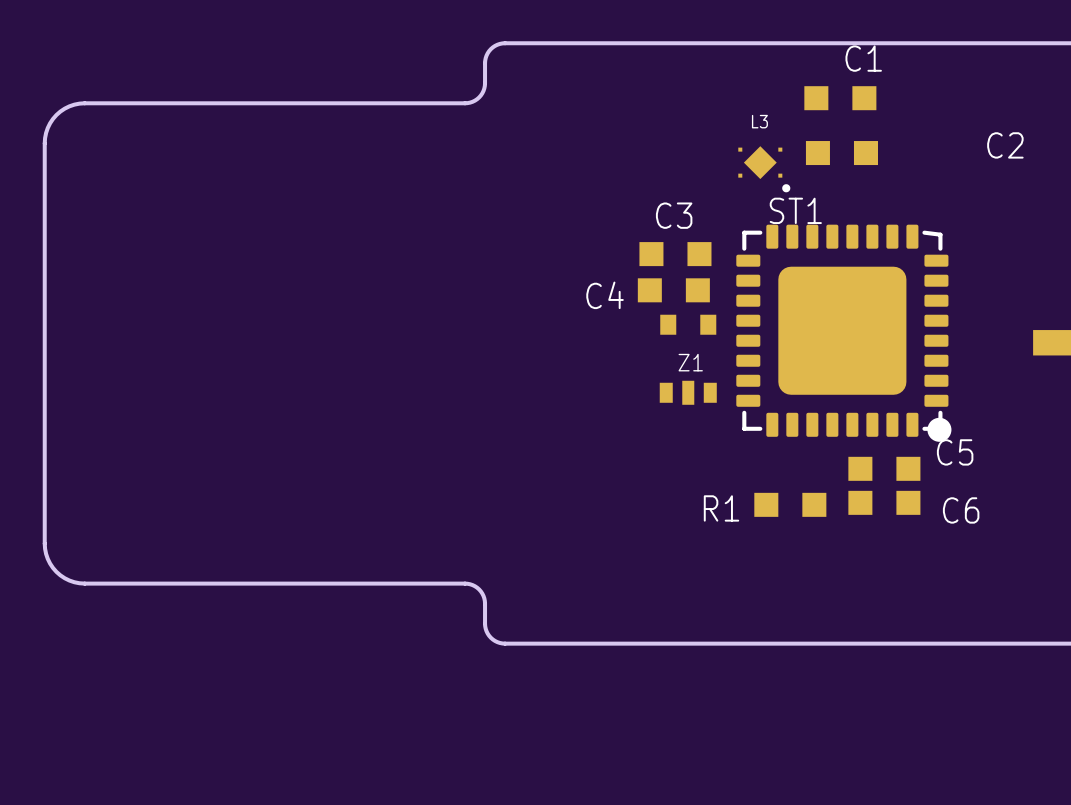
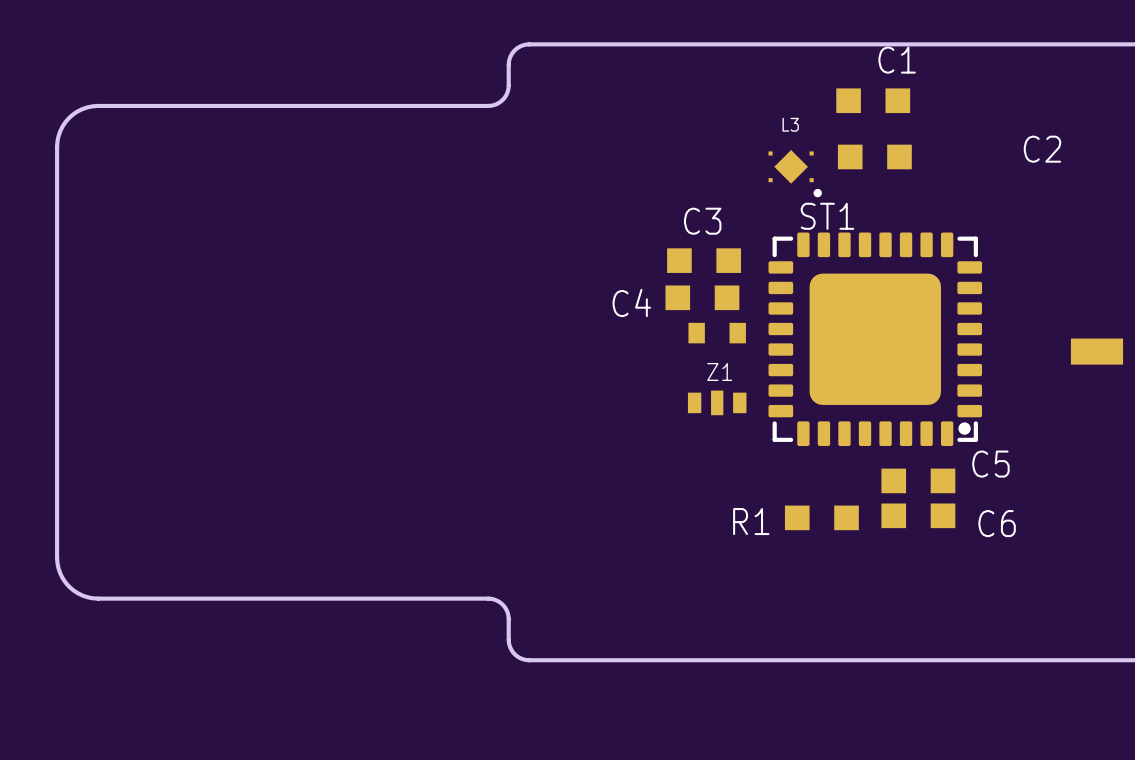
ST1 footprint: [736, 224, 952, 442] -> [768, 232, 983, 447]

